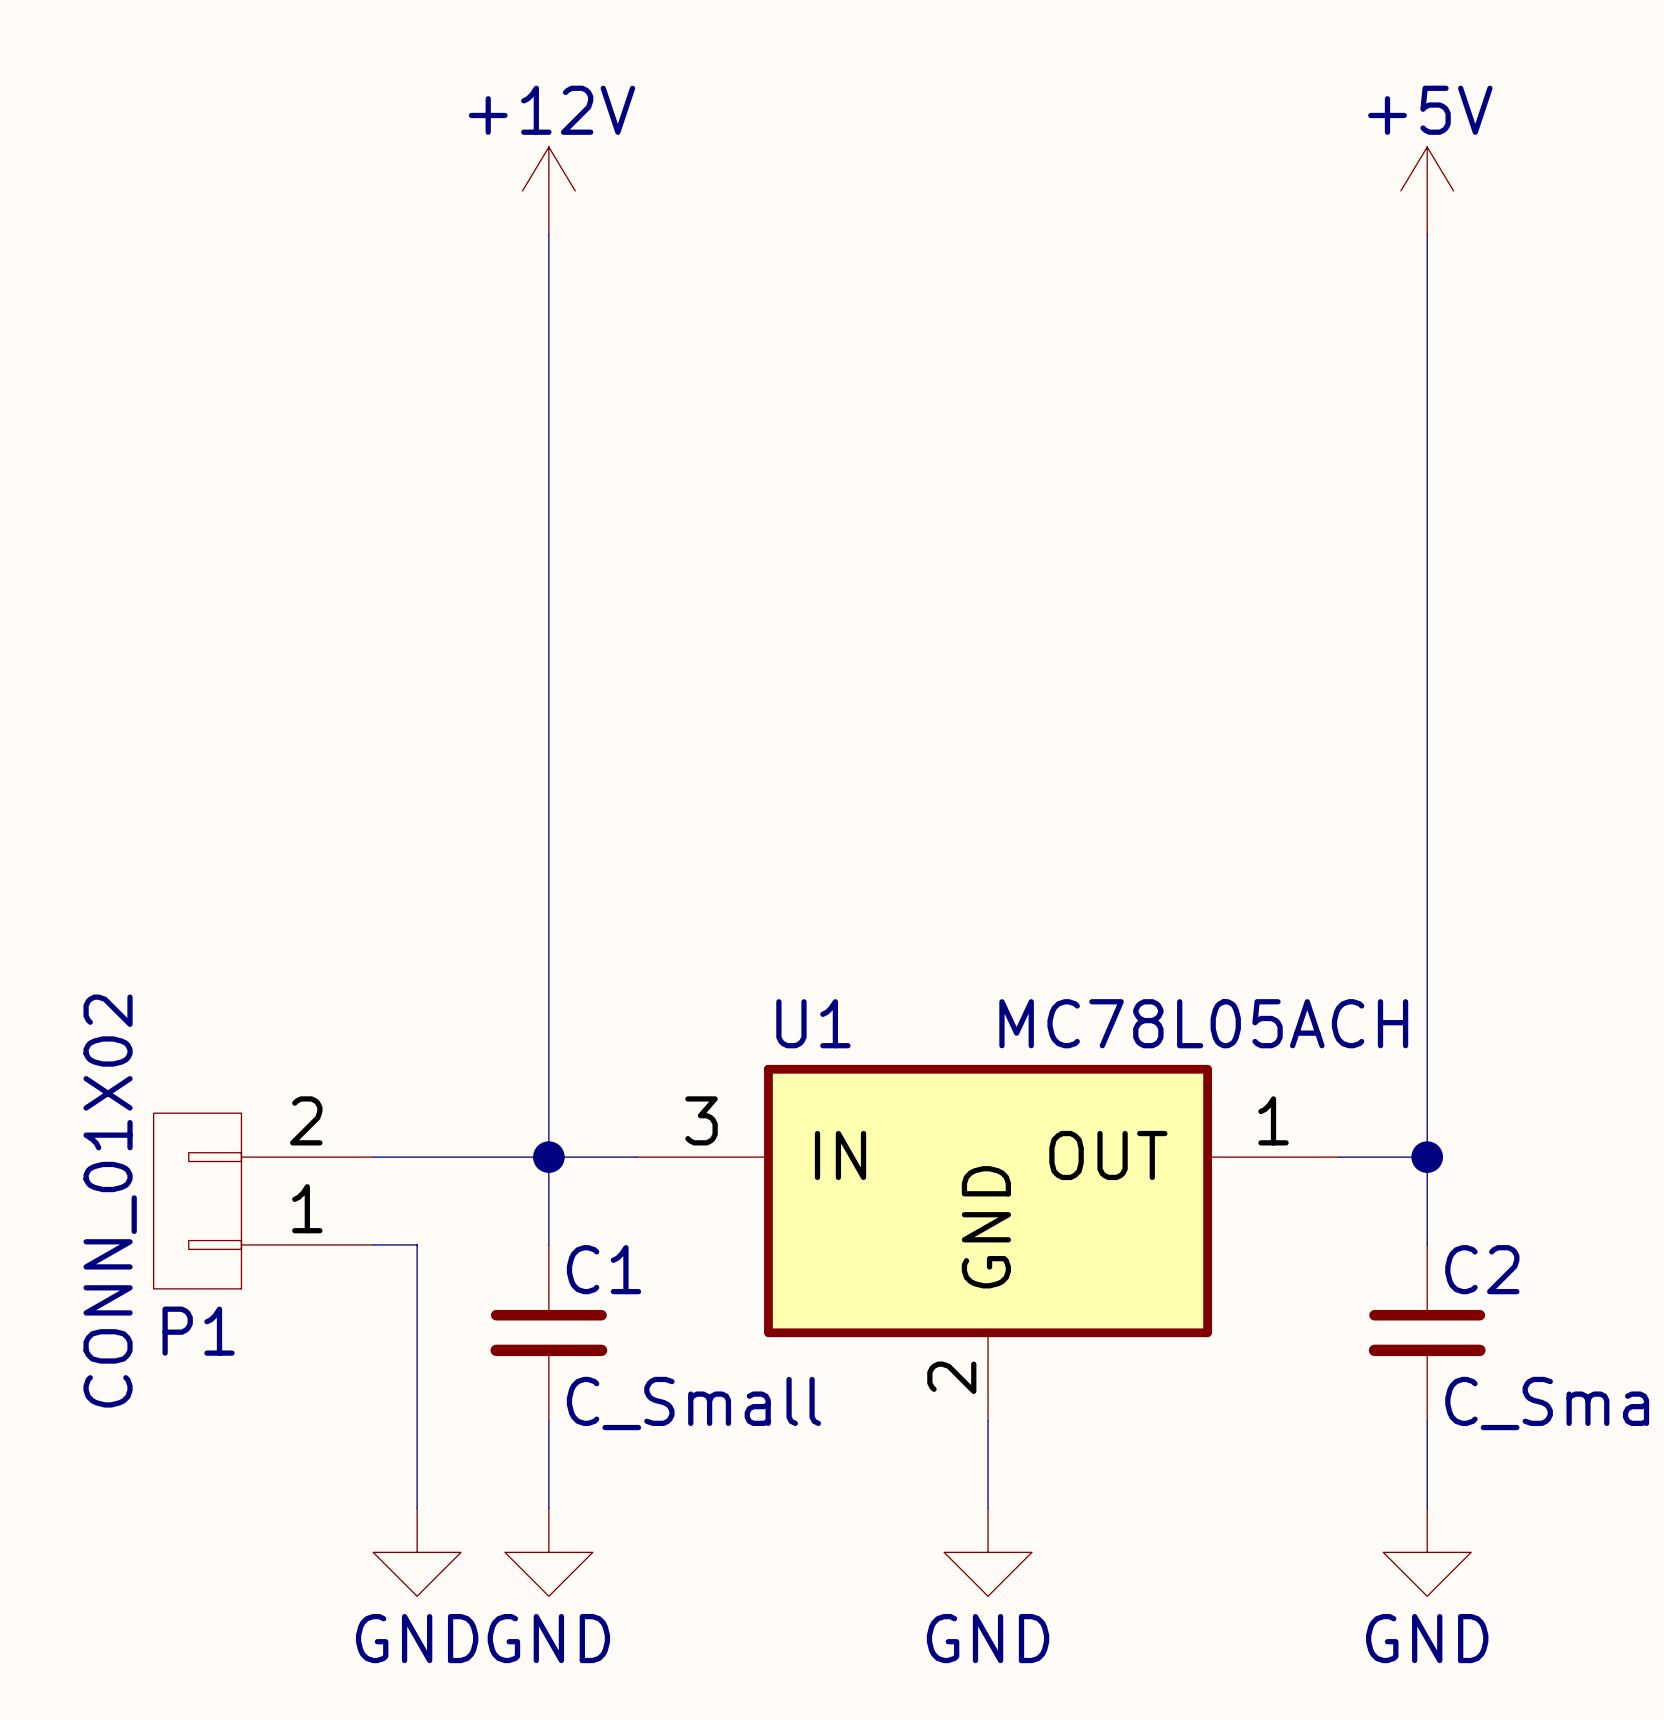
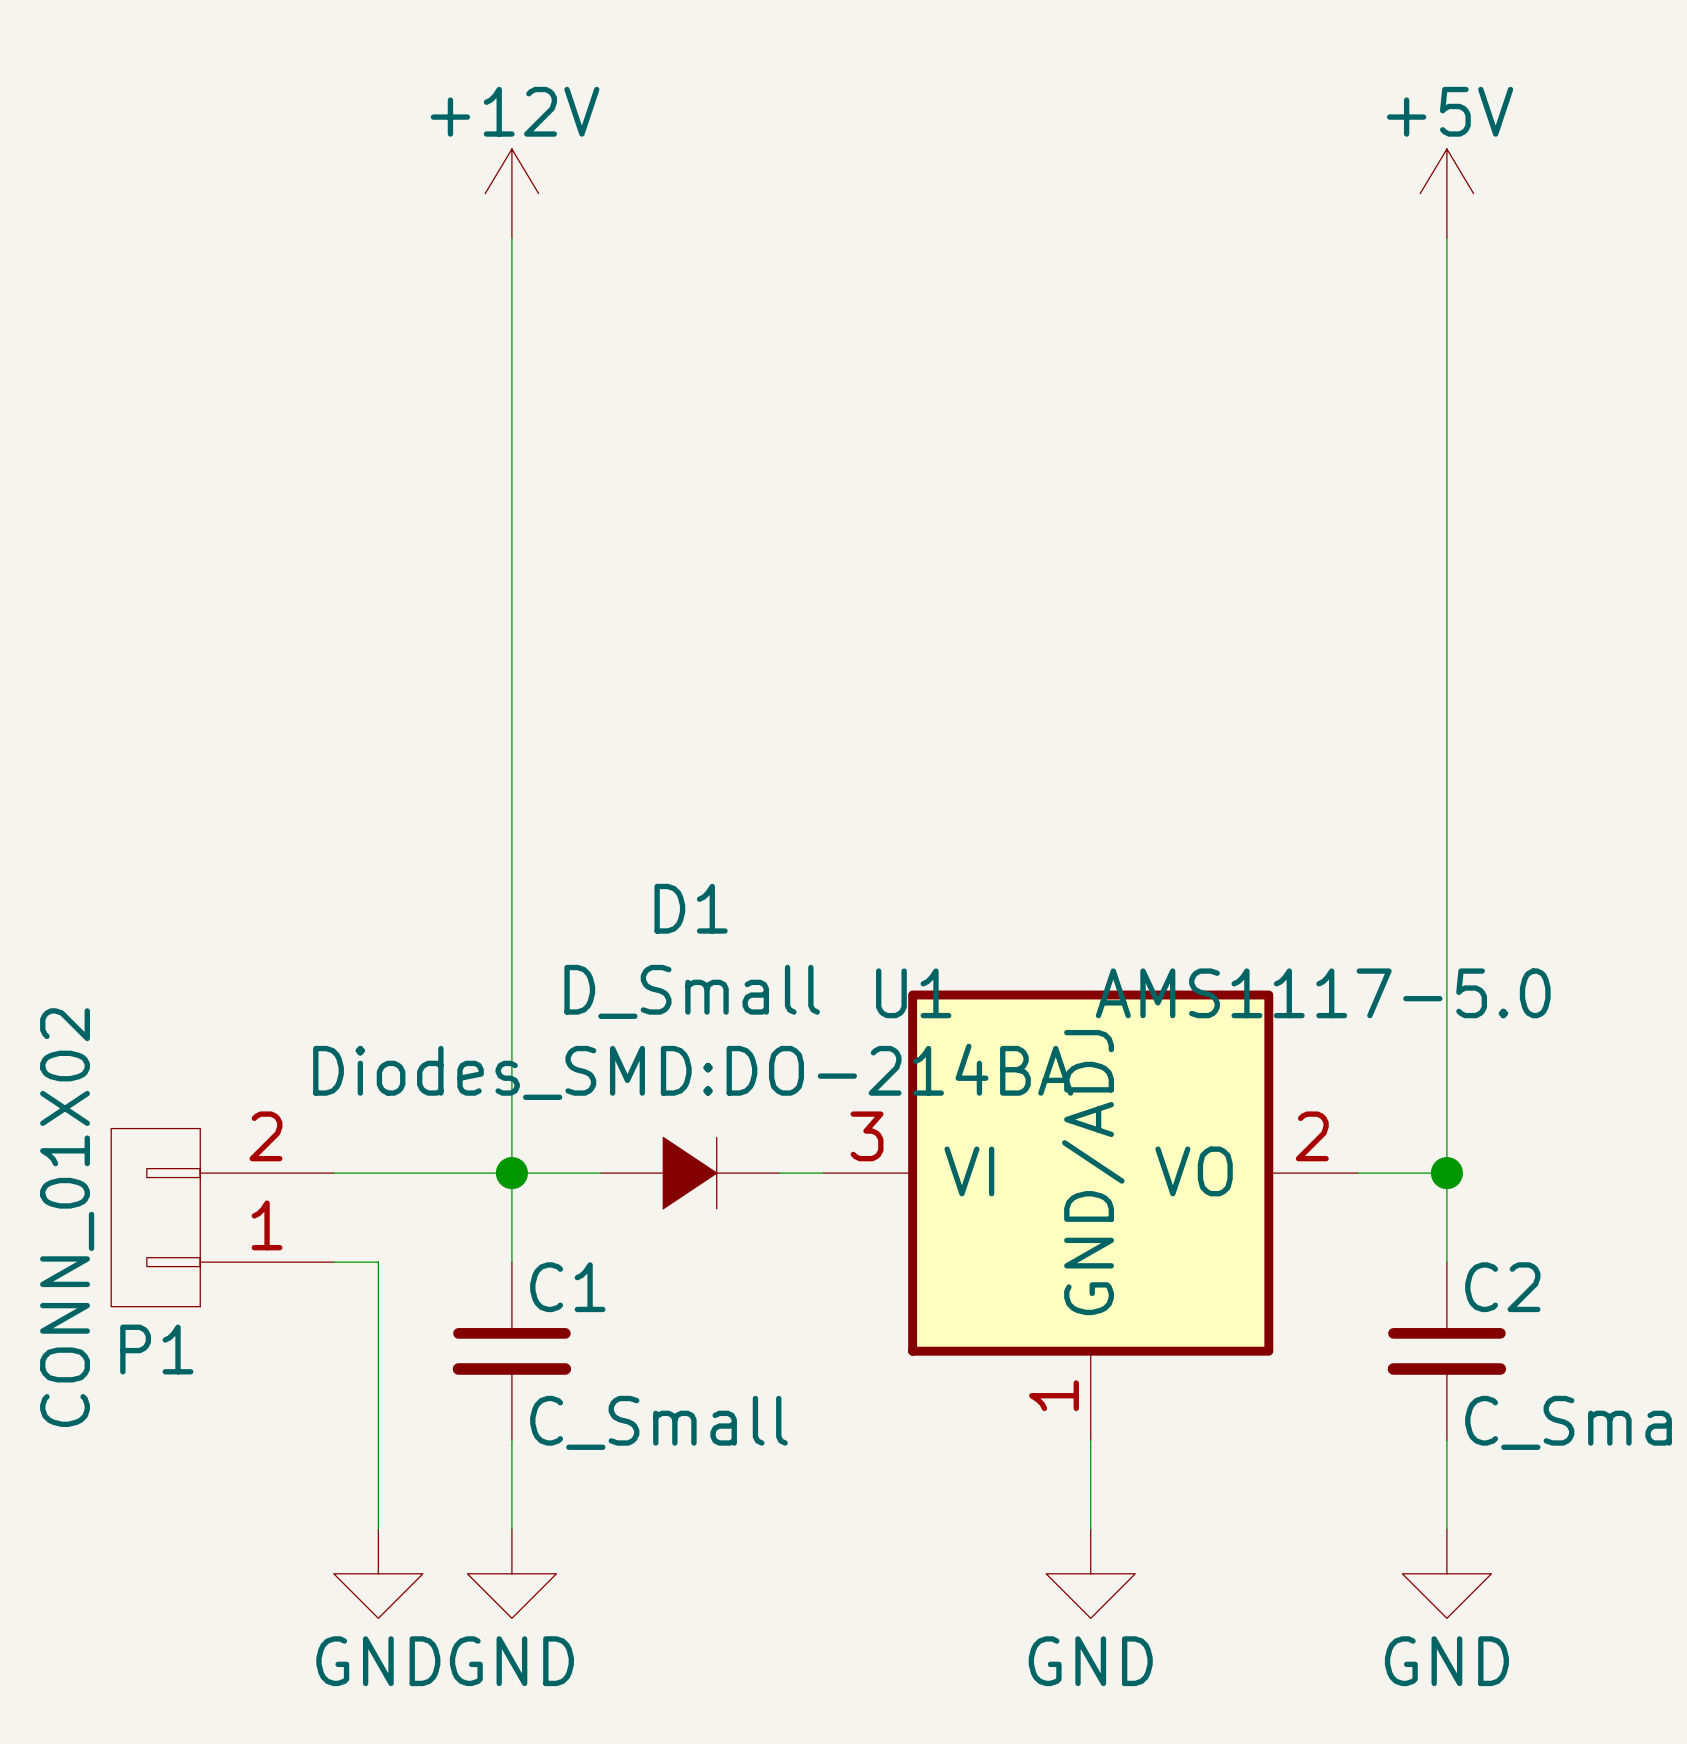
power symbol position: +12V (548, 190) -> +12V (511, 193)
wire: (548, 234) (548, 1244) -> (511, 238) (511, 1262)
U1 value: MC78L05ACH (1203, 1023) -> AMS1117-5.0 (1323, 993)
U1 symbol: [636, 1064, 1340, 1421] -> [823, 990, 1358, 1441]
junction position: (548, 1157) -> (511, 1173)
D1: none -> D_Small (690, 1173)
P1 position: (263, 1201) -> (222, 1217)
wire: (373, 1244) (417, 1244) (417, 1508) -> (333, 1262) (378, 1262) (378, 1529)
C1 position: (548, 1332) -> (511, 1351)
wire: (548, 1420) (548, 1508) -> (511, 1440) (511, 1529)
wire: (988, 1420) (988, 1508) -> (1090, 1440) (1090, 1529)
power symbol: none -> GND (378, 1573)
power symbol: GND (417, 1552) -> none
power symbol: none -> GND (511, 1573)
power symbol: GND (548, 1552) -> none
power symbol position: GND (988, 1552) -> GND (1090, 1573)

